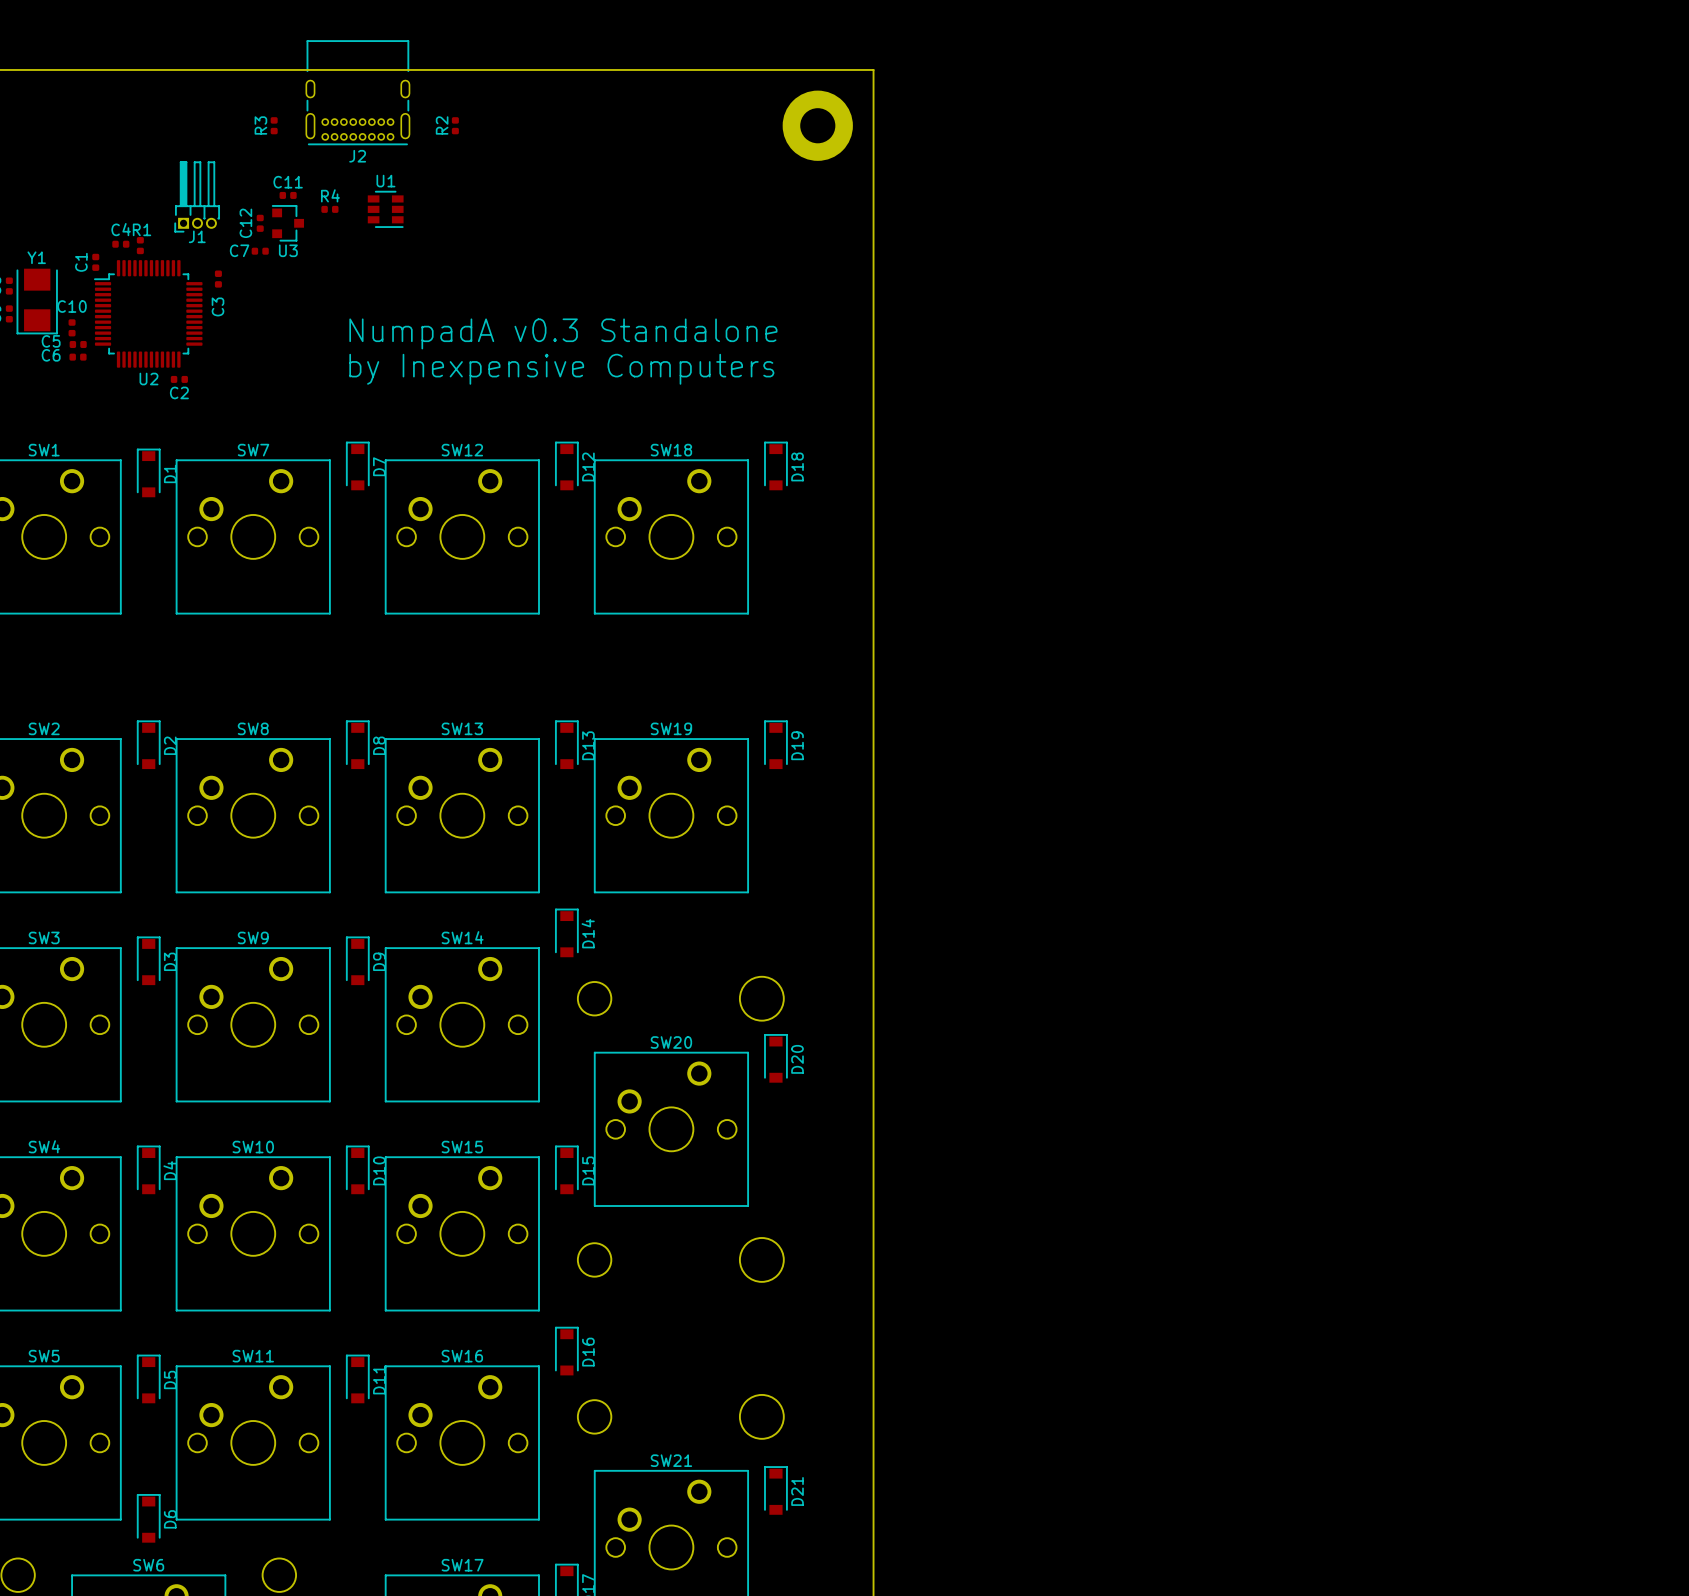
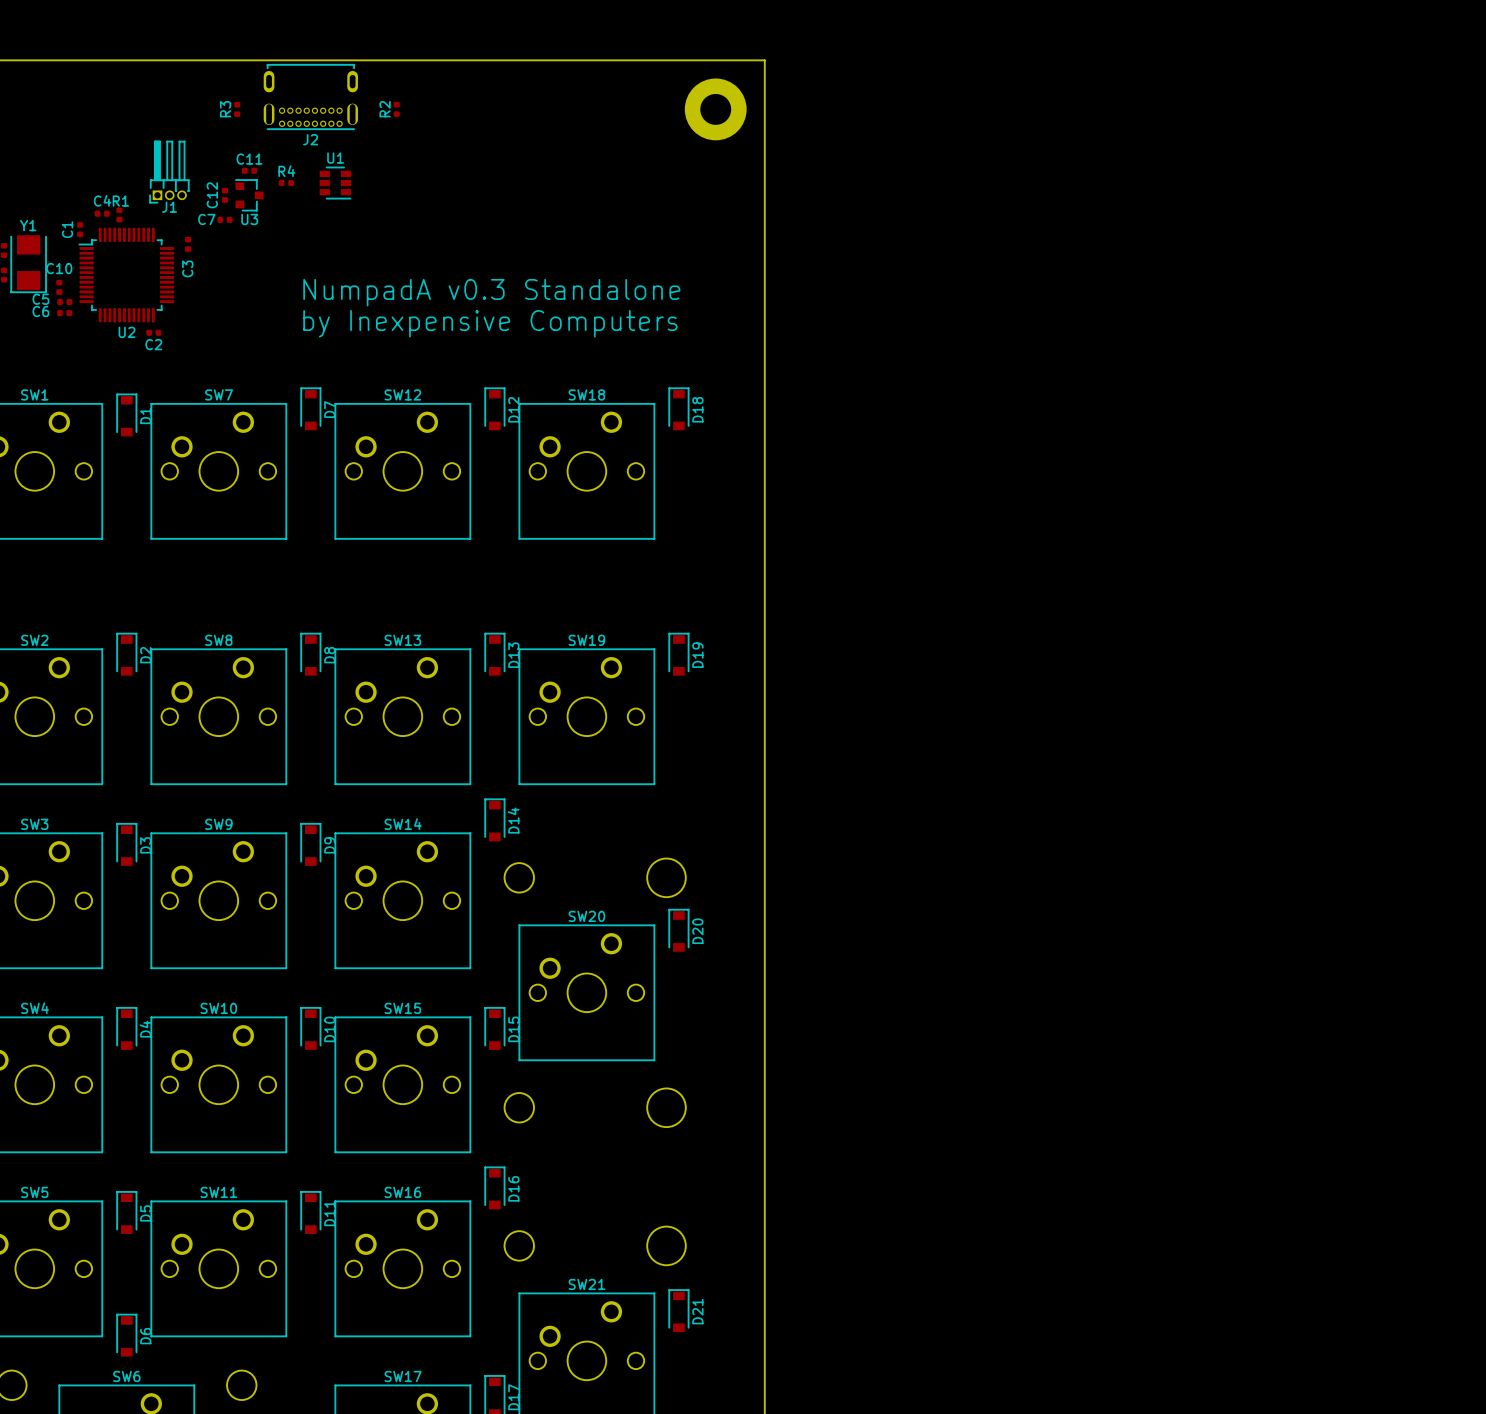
J2 footprint: [305, 40, 411, 146] -> [263, 63, 358, 131]

